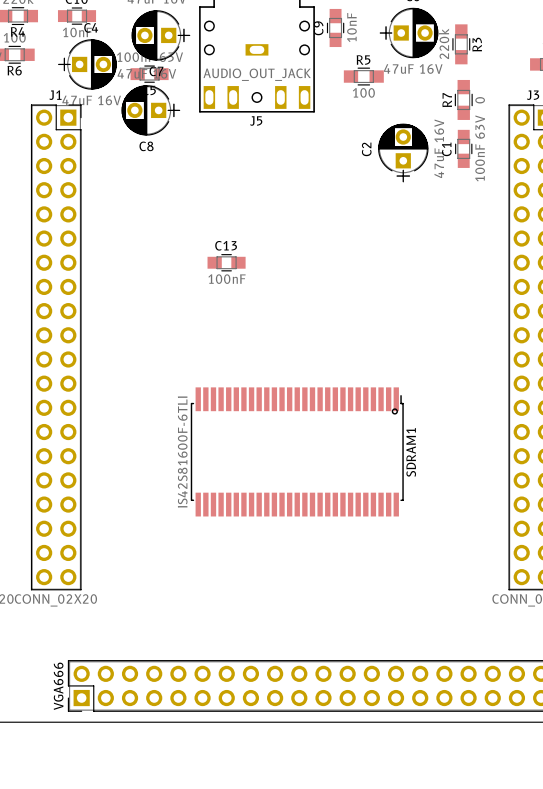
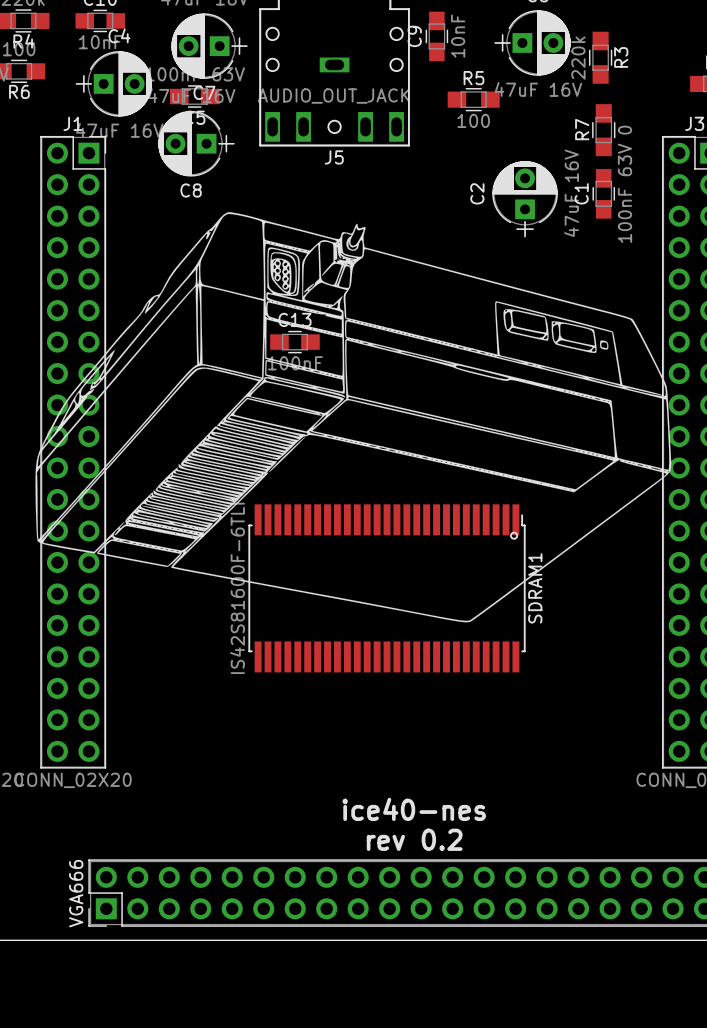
drawing: none -> [35, 212, 672, 623]
text: none -> ice40-nes (414, 809)
text: none -> rev 0.2 (414, 839)

